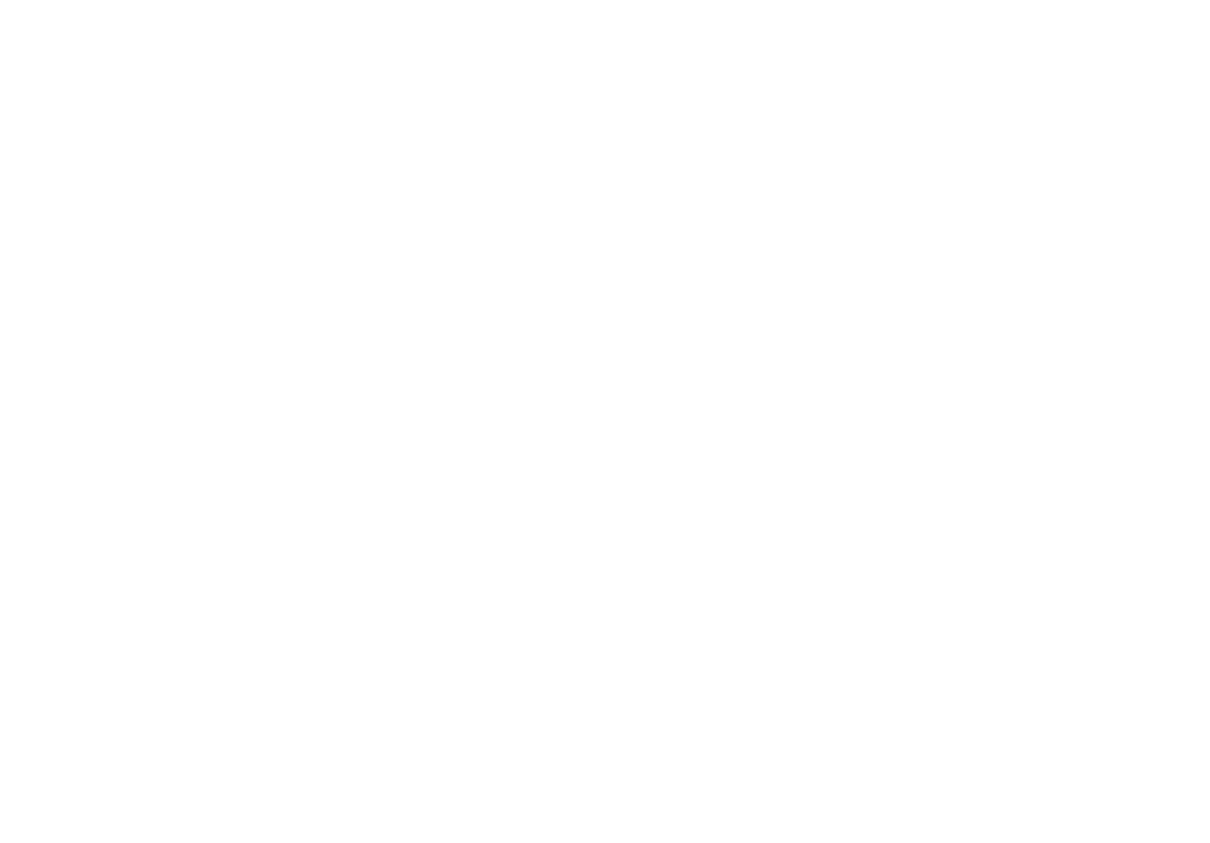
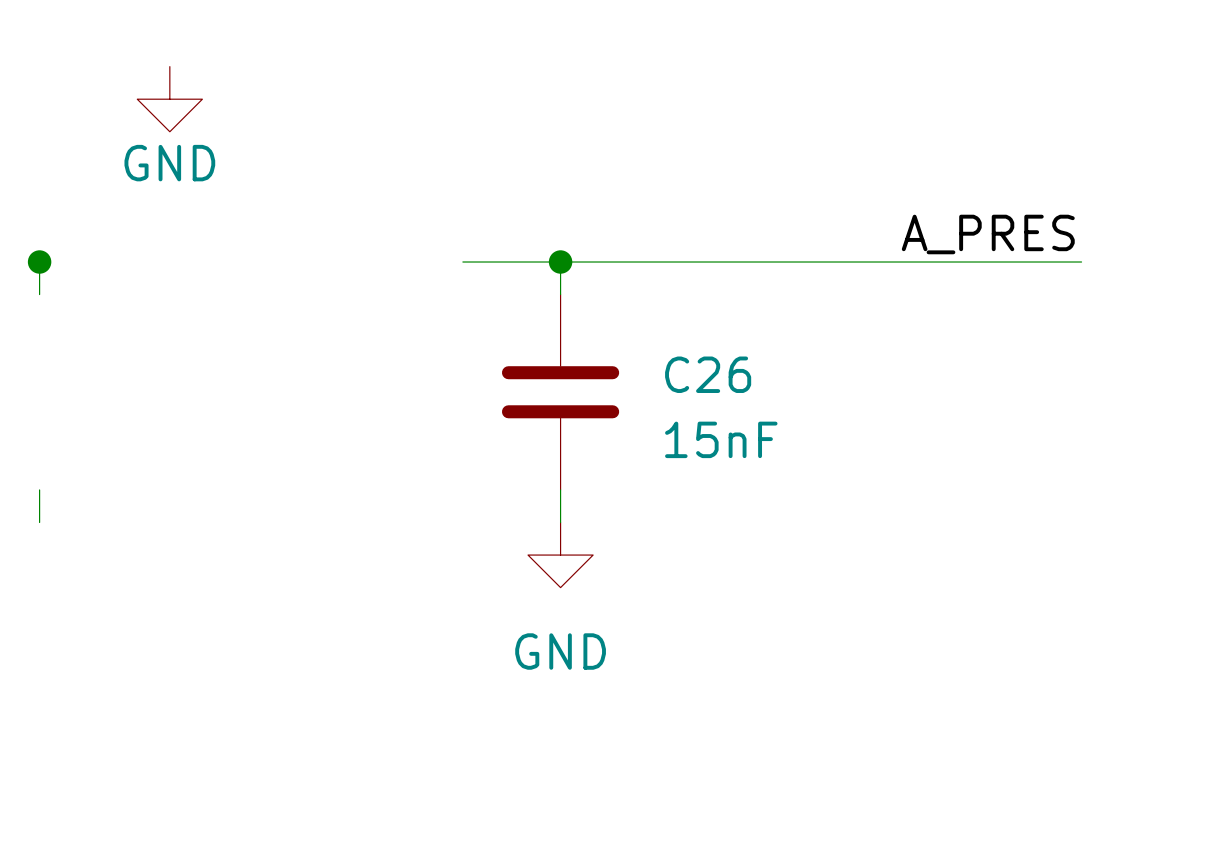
power symbol: none -> GND (169, 99)
label: none -> A_PRES (988, 234)
wire: none -> (39, 262) (39, 294)
junction: none -> (39, 262)
wire: none -> (462, 262) (1081, 262)
wire: none -> (560, 262) (560, 294)
junction: none -> (560, 262)
C26: none -> 15nF (560, 392)
wire: none -> (39, 489) (39, 522)
wire: none -> (560, 489) (560, 522)
power symbol: none -> GND (560, 555)

